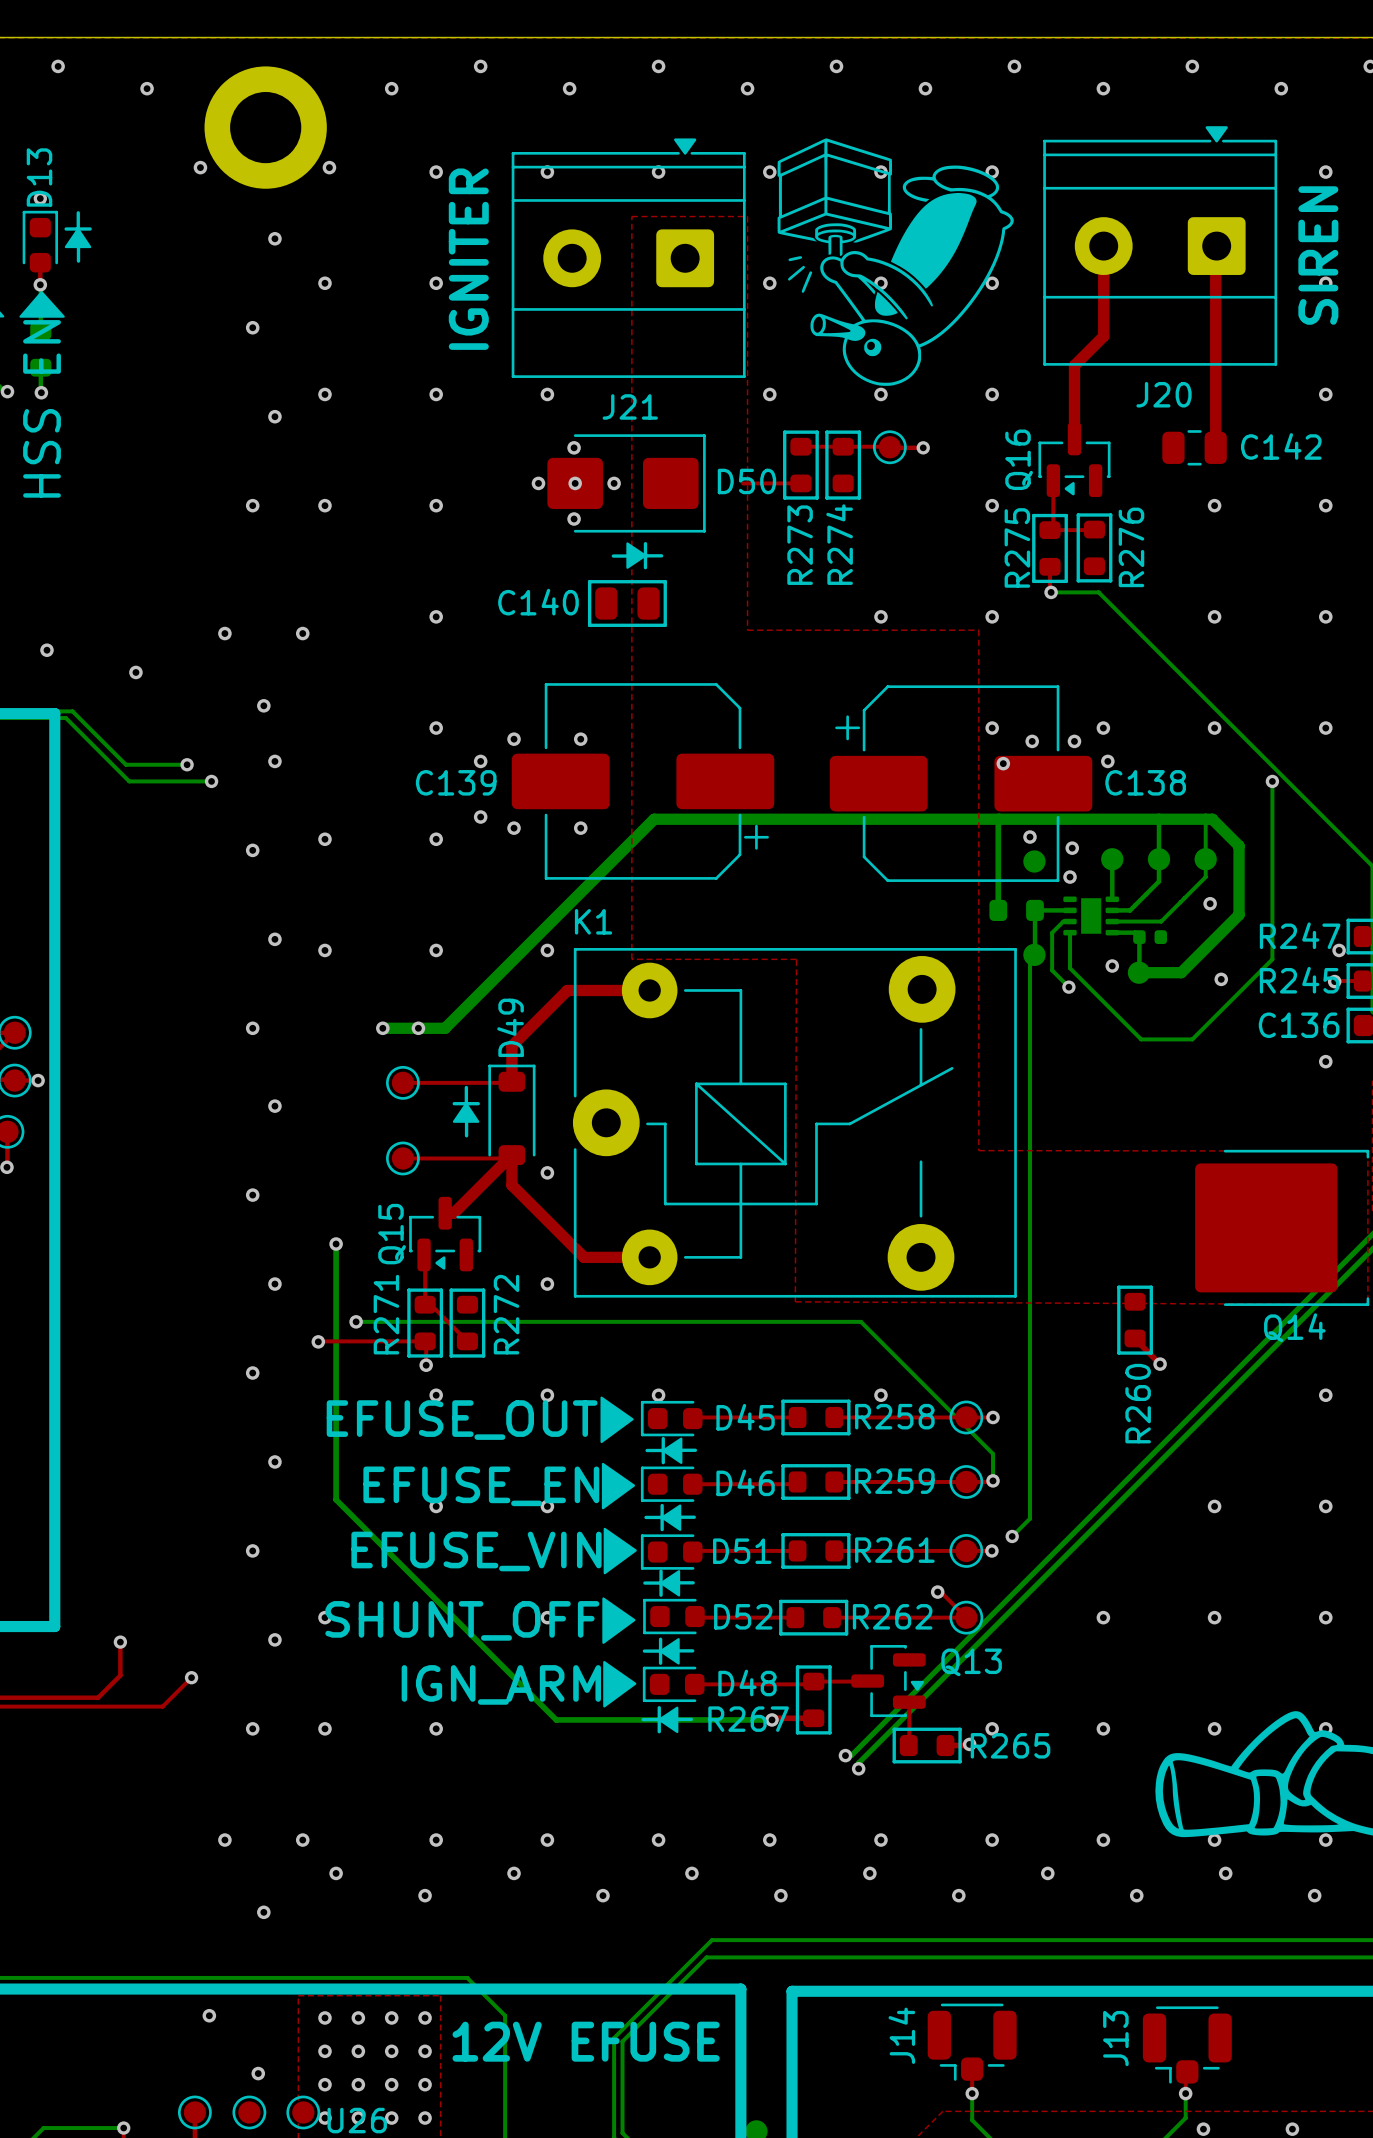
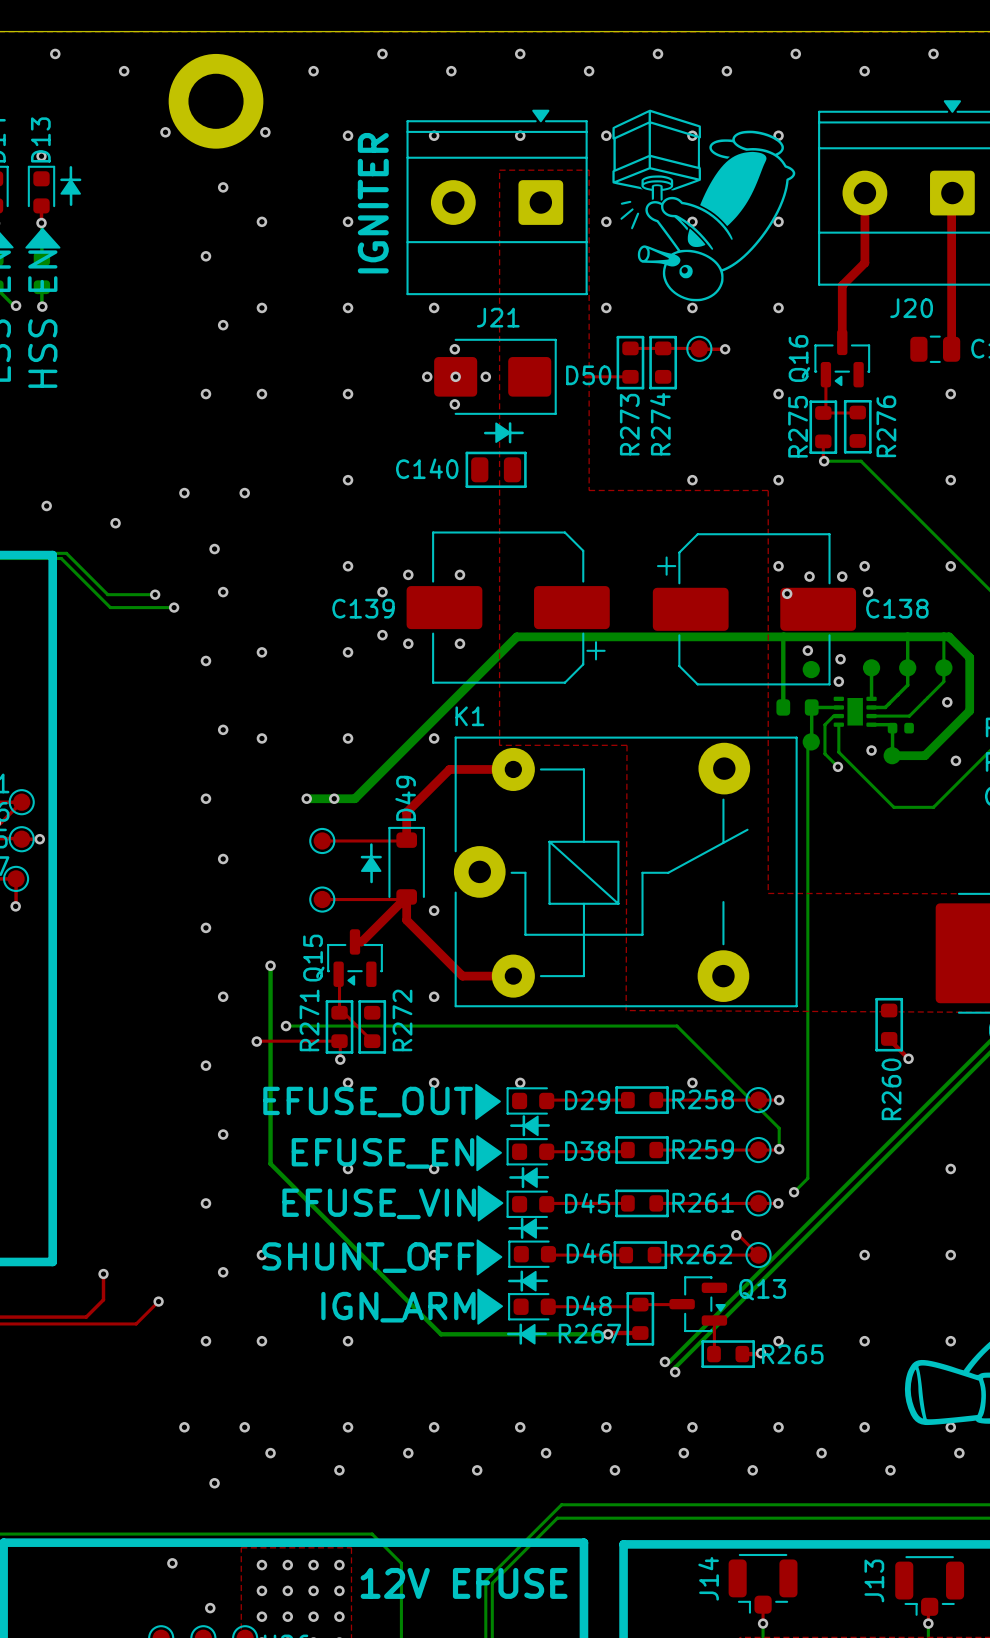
D45 name: D45 (745, 1417) -> D29 (587, 1100)
D46 name: D46 (745, 1482) -> D38 (587, 1151)
D51 name: D51 (742, 1551) -> D45 (587, 1203)
D52 name: D52 (743, 1616) -> D46 (589, 1253)

